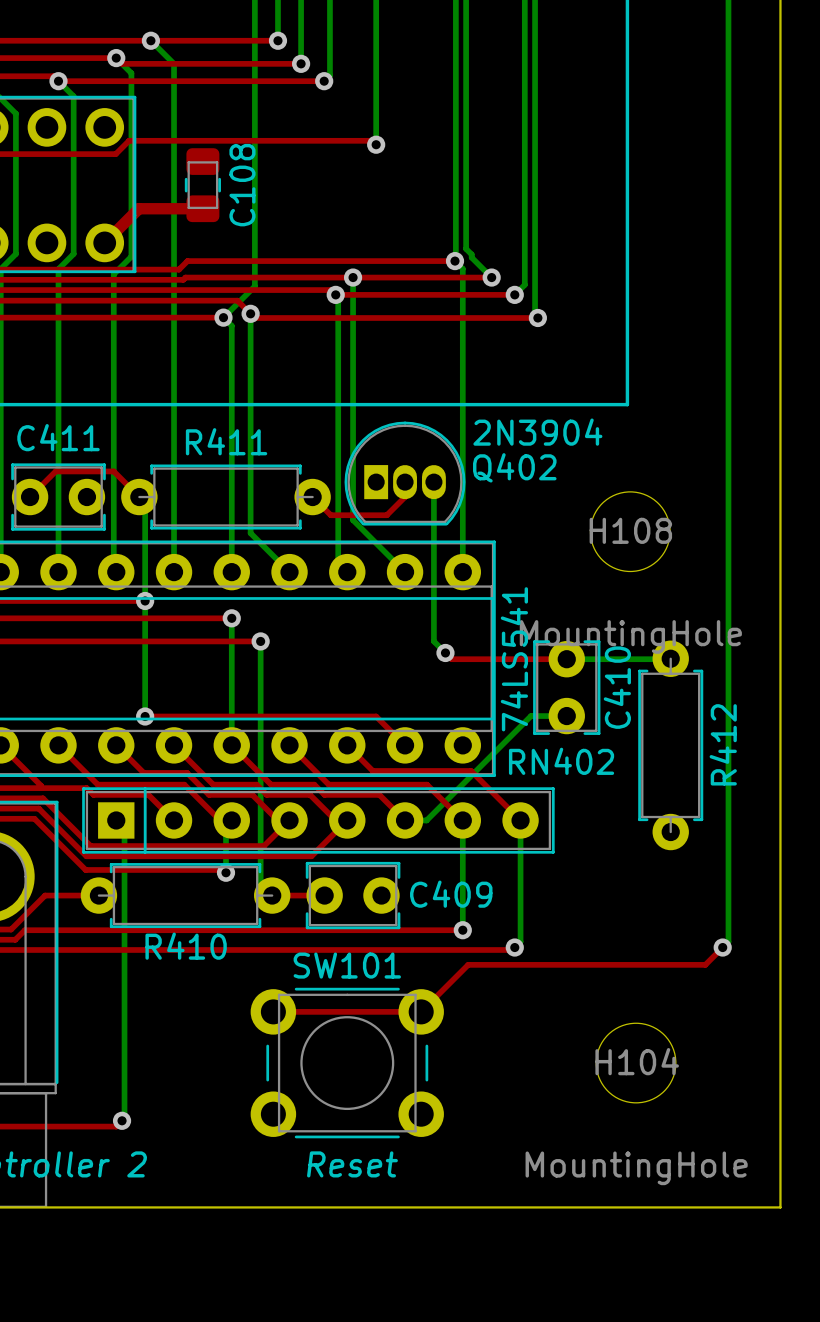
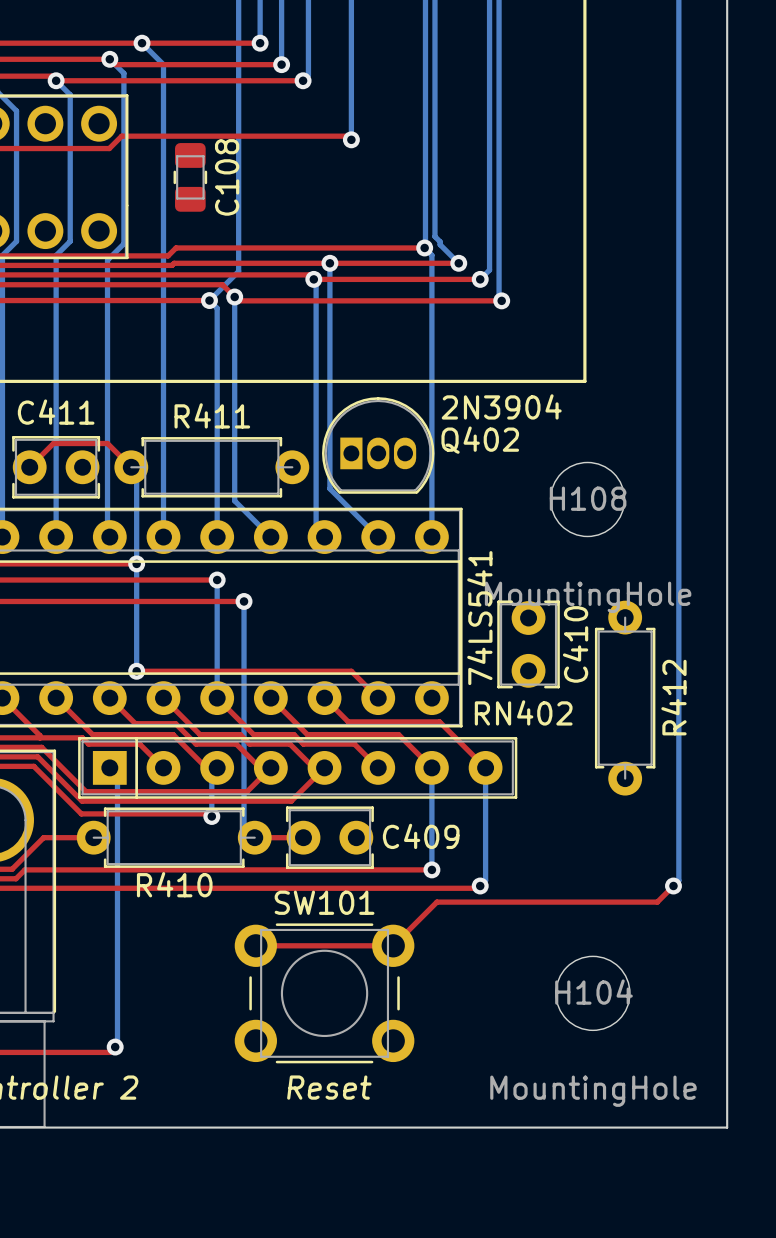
top track: (202, 208) (138, 208) (104, 242) -> none
top track: (405, 482) (405, 497) (386, 515) (330, 515) (312, 497) -> none
bottom track: (433, 482) (433, 641) (445, 652) -> none
top track: (445, 652) (451, 659) (566, 659) -> none
via: (445, 652) -> none
bottom track: (670, 658) (566, 659) -> none
bottom track: (566, 716) (531, 716) (426, 820) (405, 820) -> none

